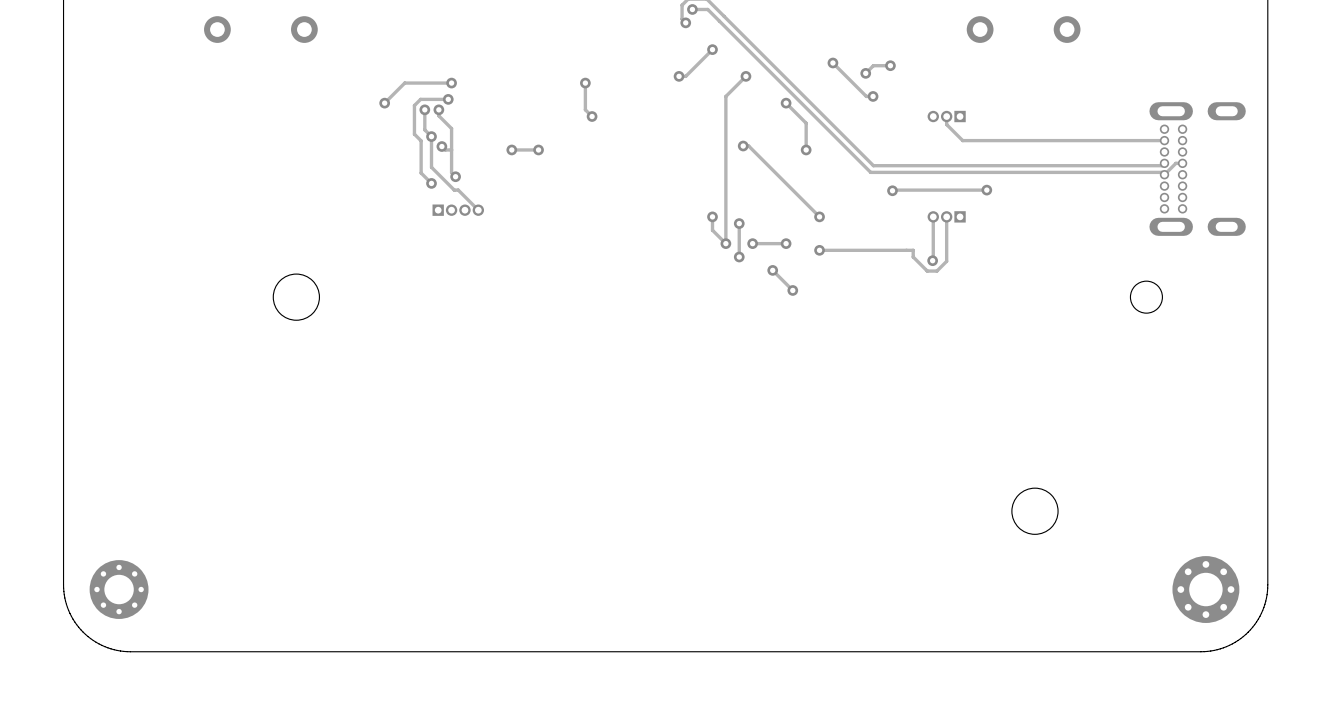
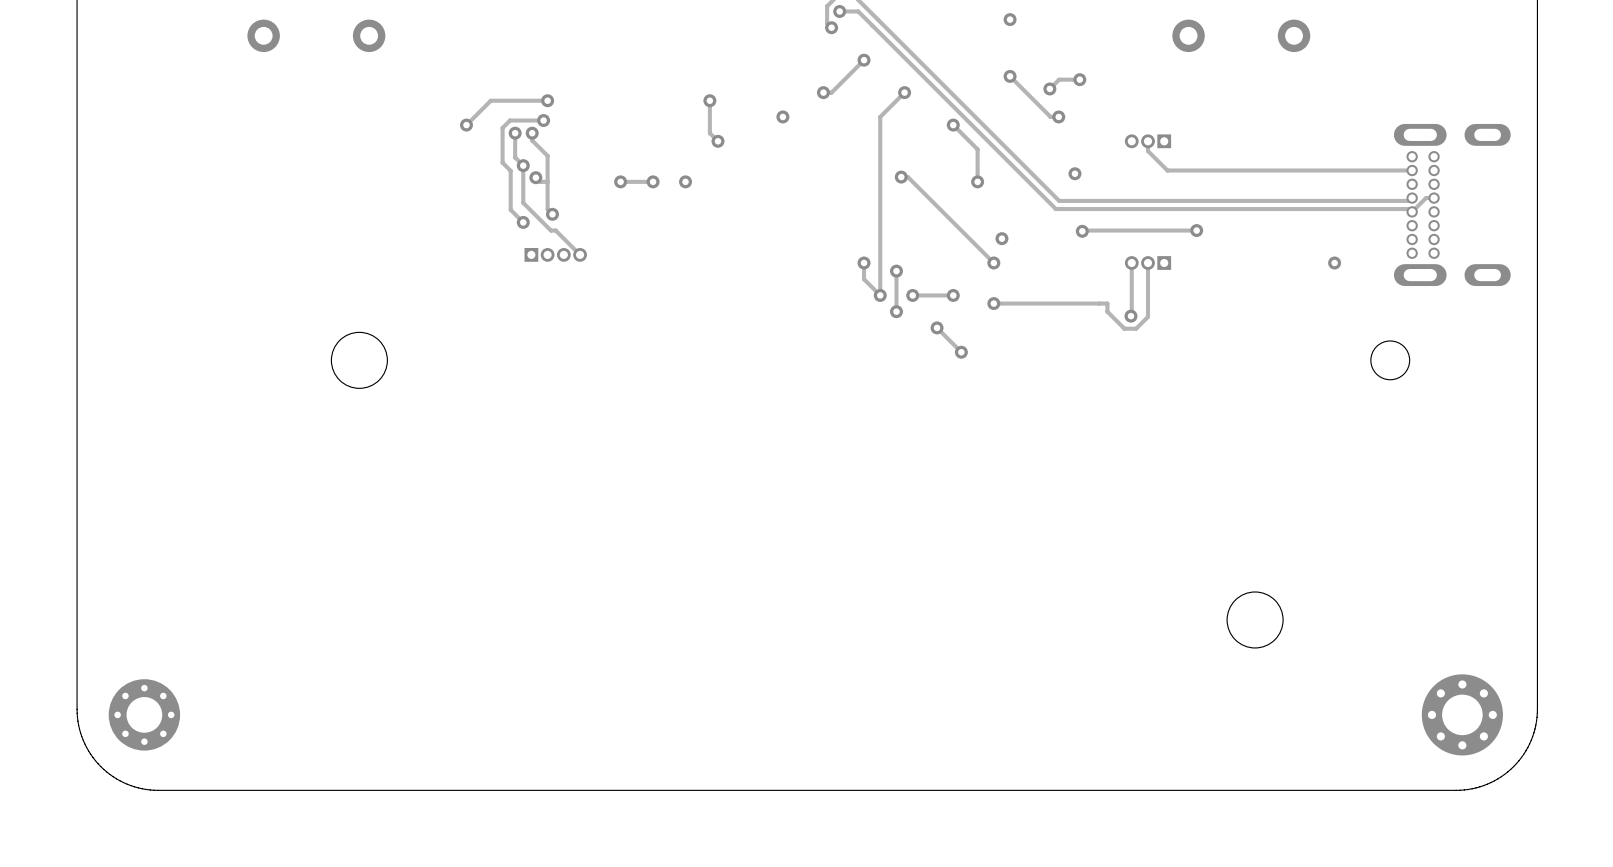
via: none -> (1010, 19)
via: none -> (782, 116)
via: none -> (1074, 173)
via: none -> (685, 181)
via: none -> (1001, 238)
via: none -> (1334, 263)

